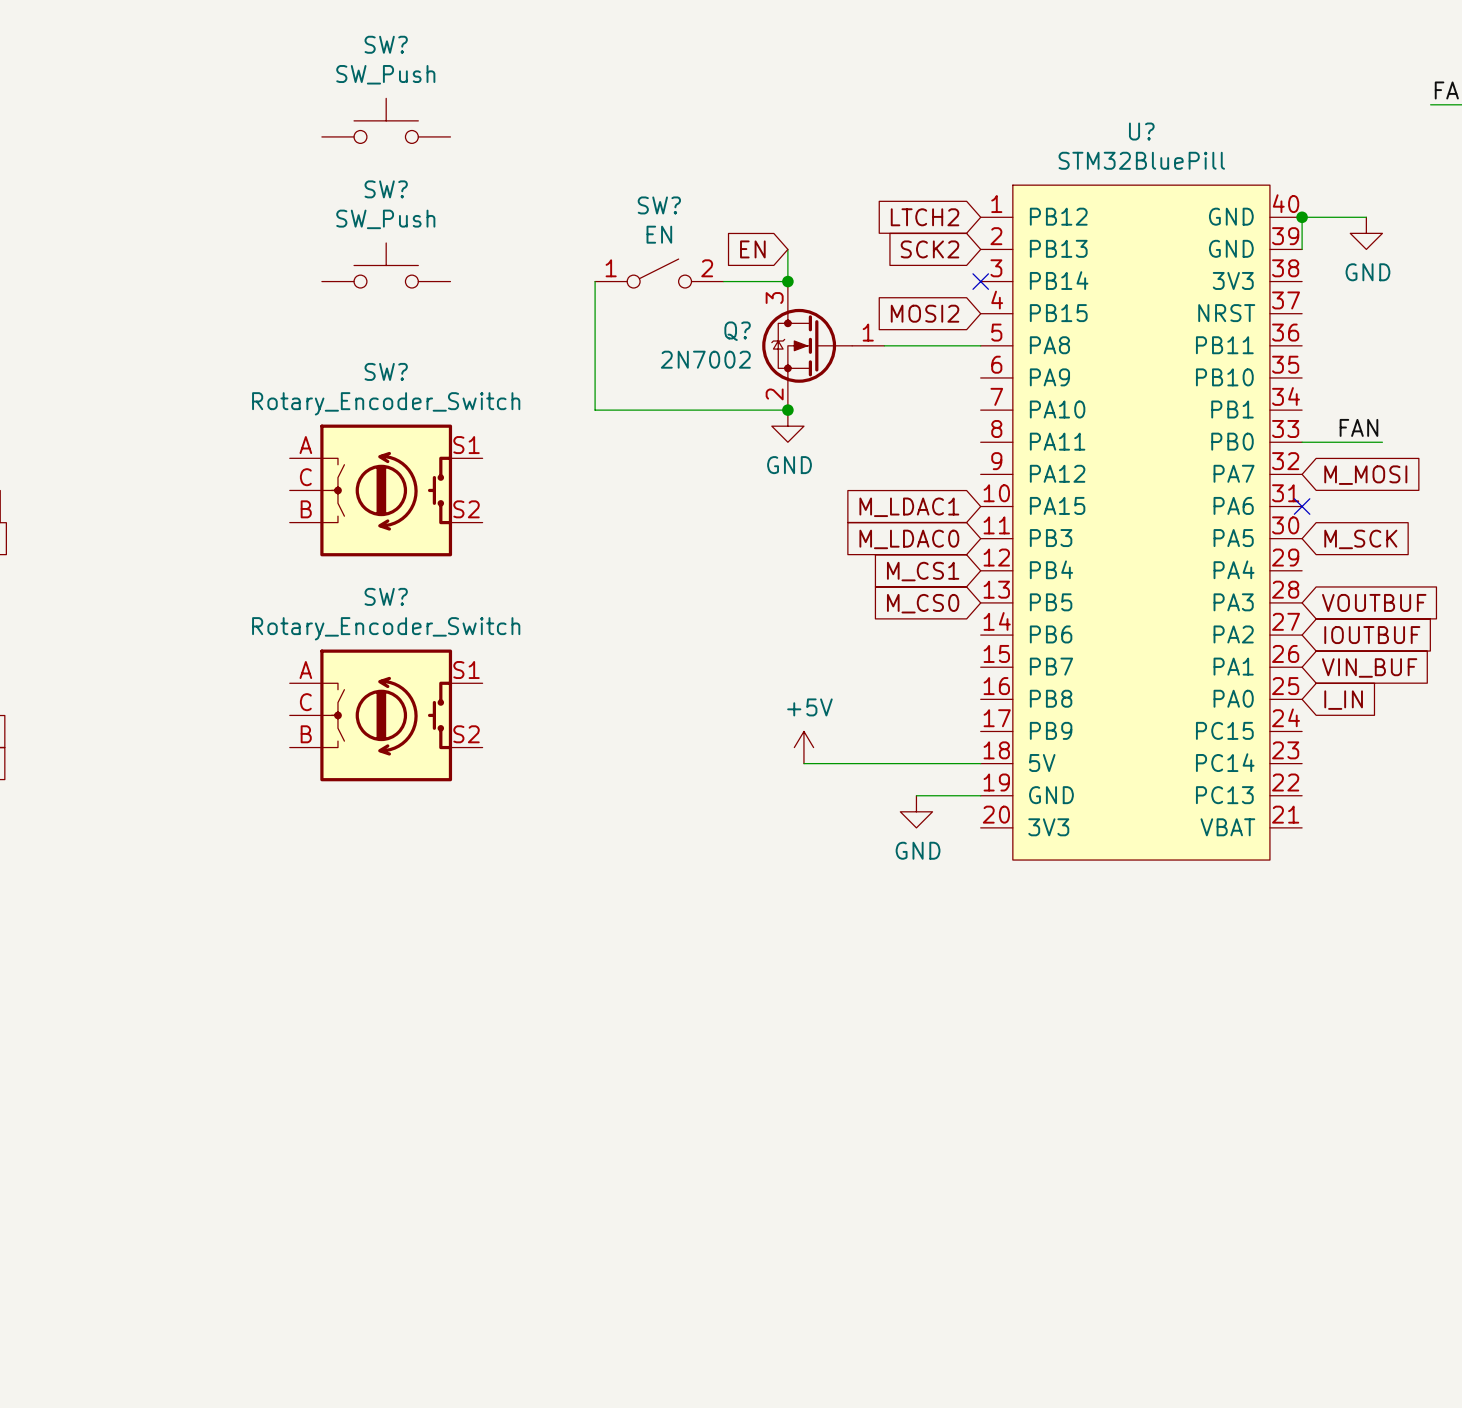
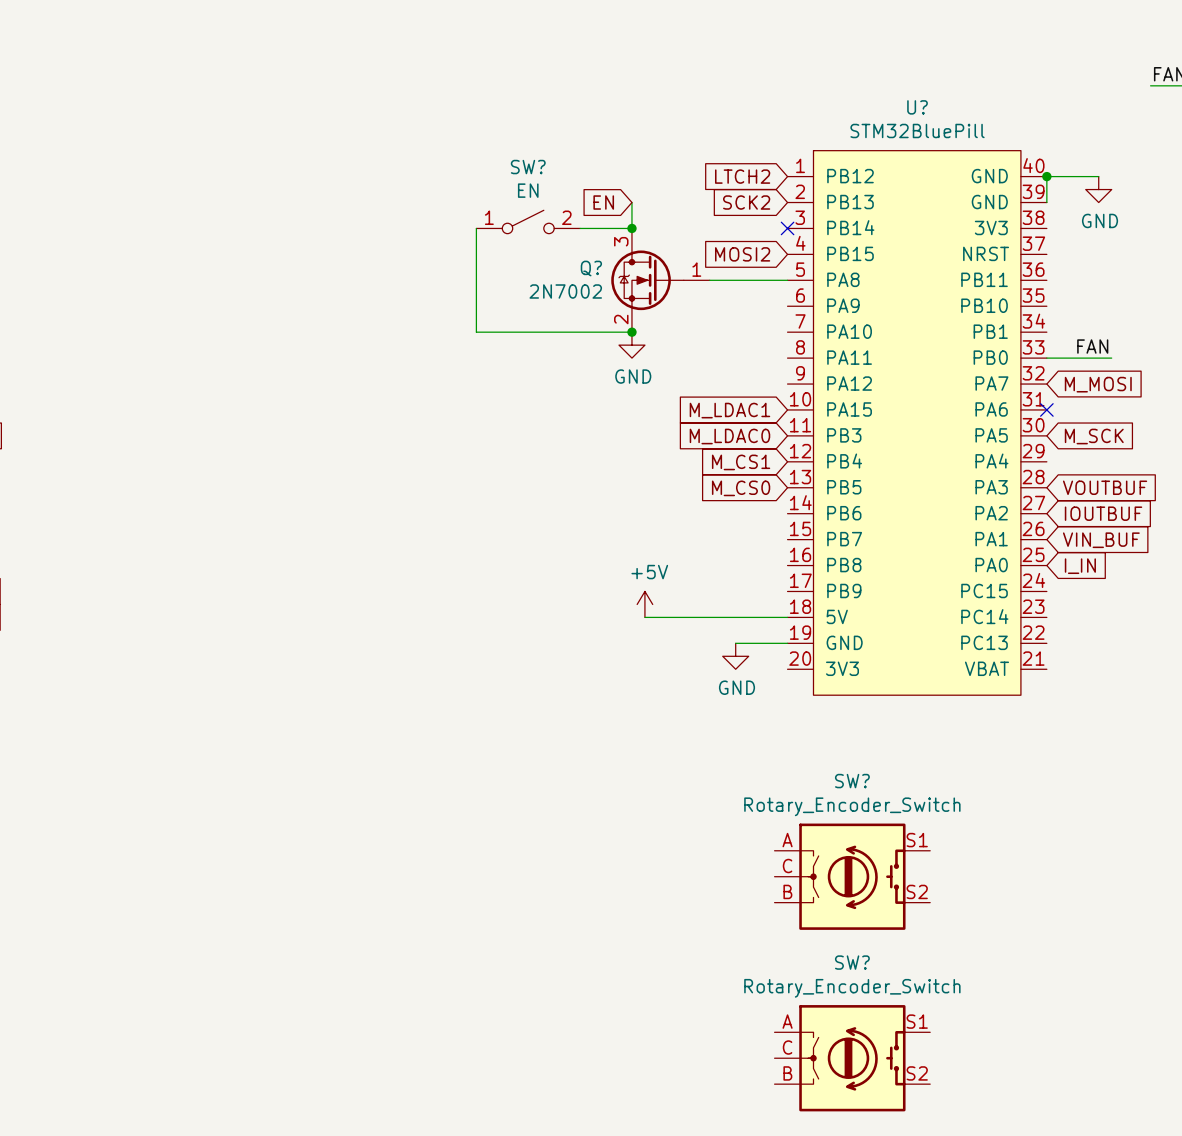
SW?: SW_Push (386, 120) -> none
SW?: SW_Push (386, 265) -> none
SW?: Rotary_Encoder_Switch (386, 490) -> none
SW?: Rotary_Encoder_Switch (386, 715) -> none
SW?: none -> Rotary_Encoder_Switch (852, 876)
SW?: none -> Rotary_Encoder_Switch (852, 1058)

